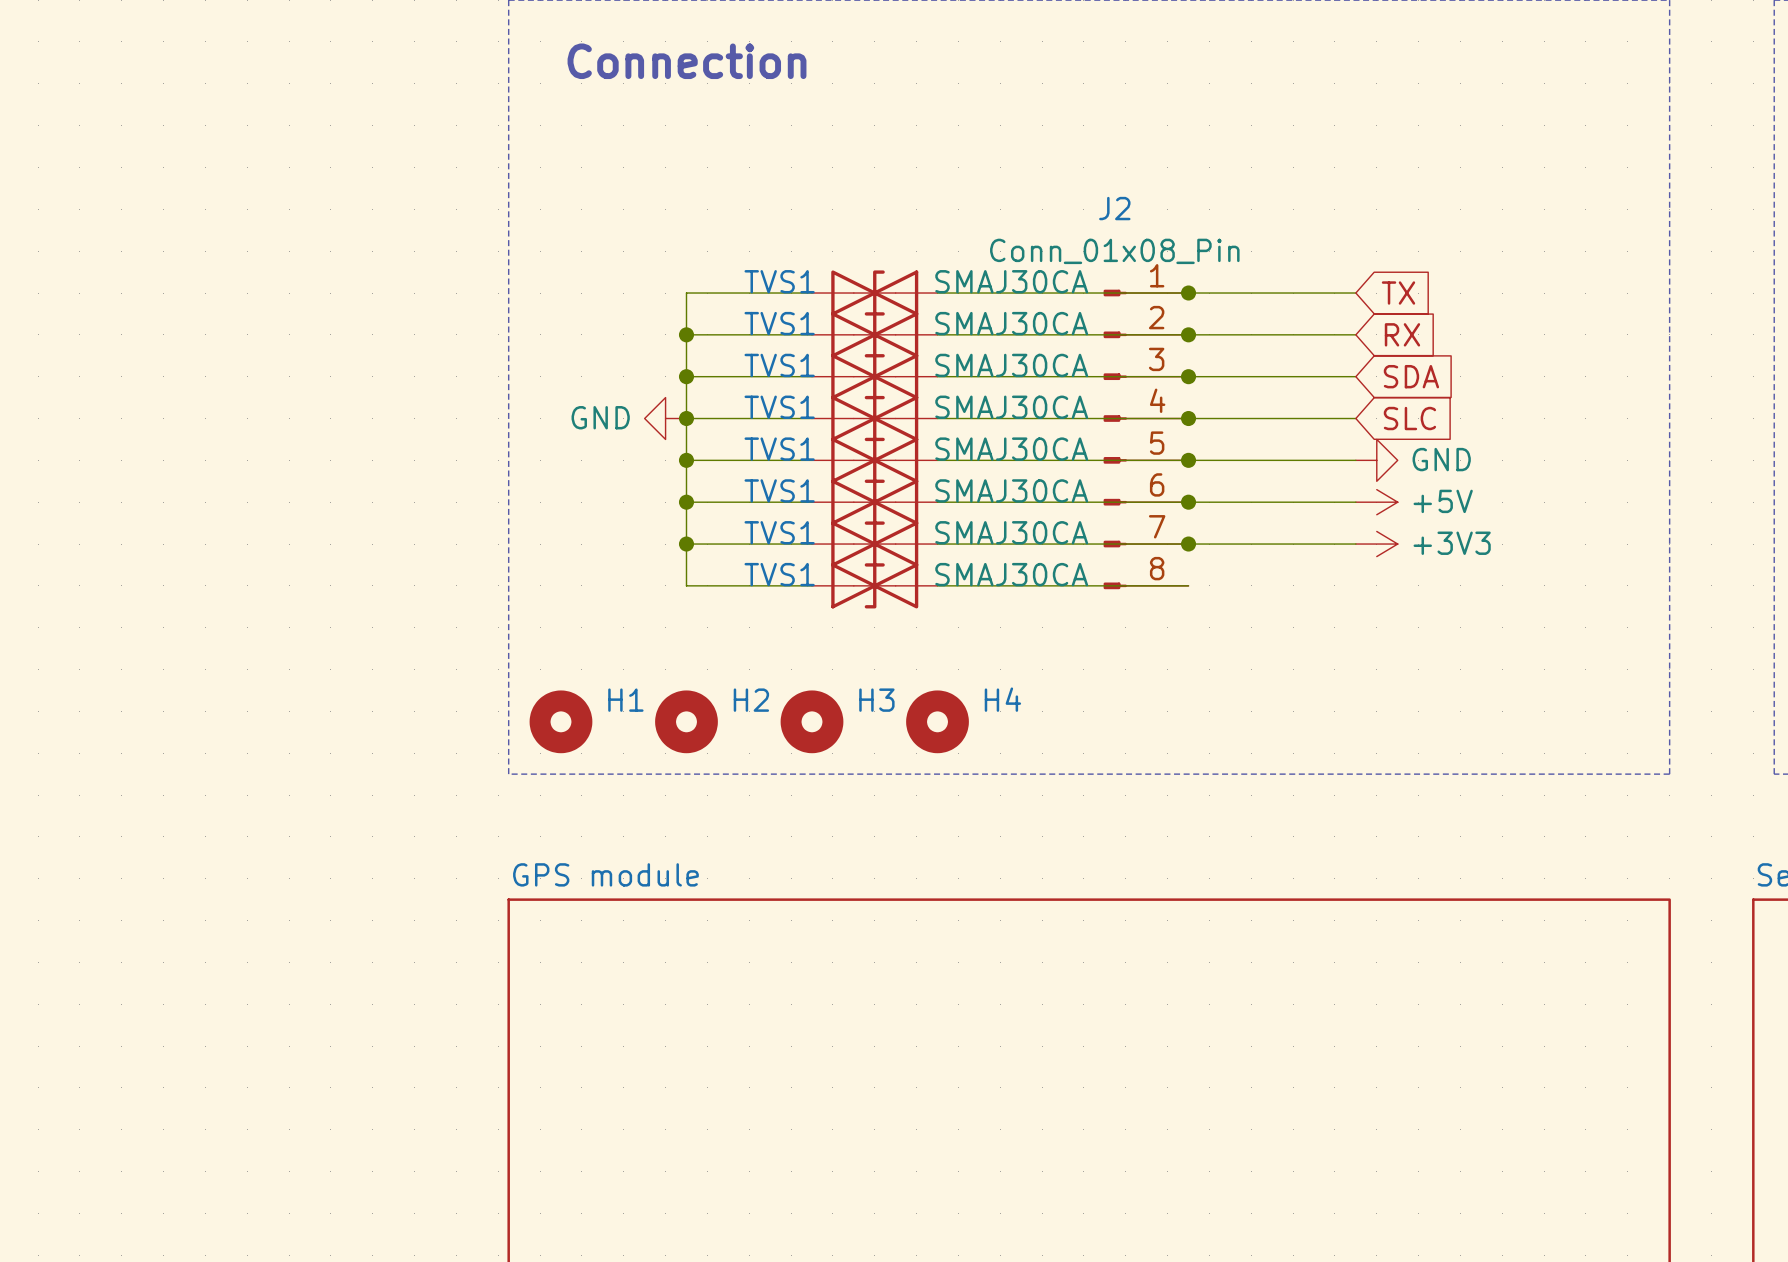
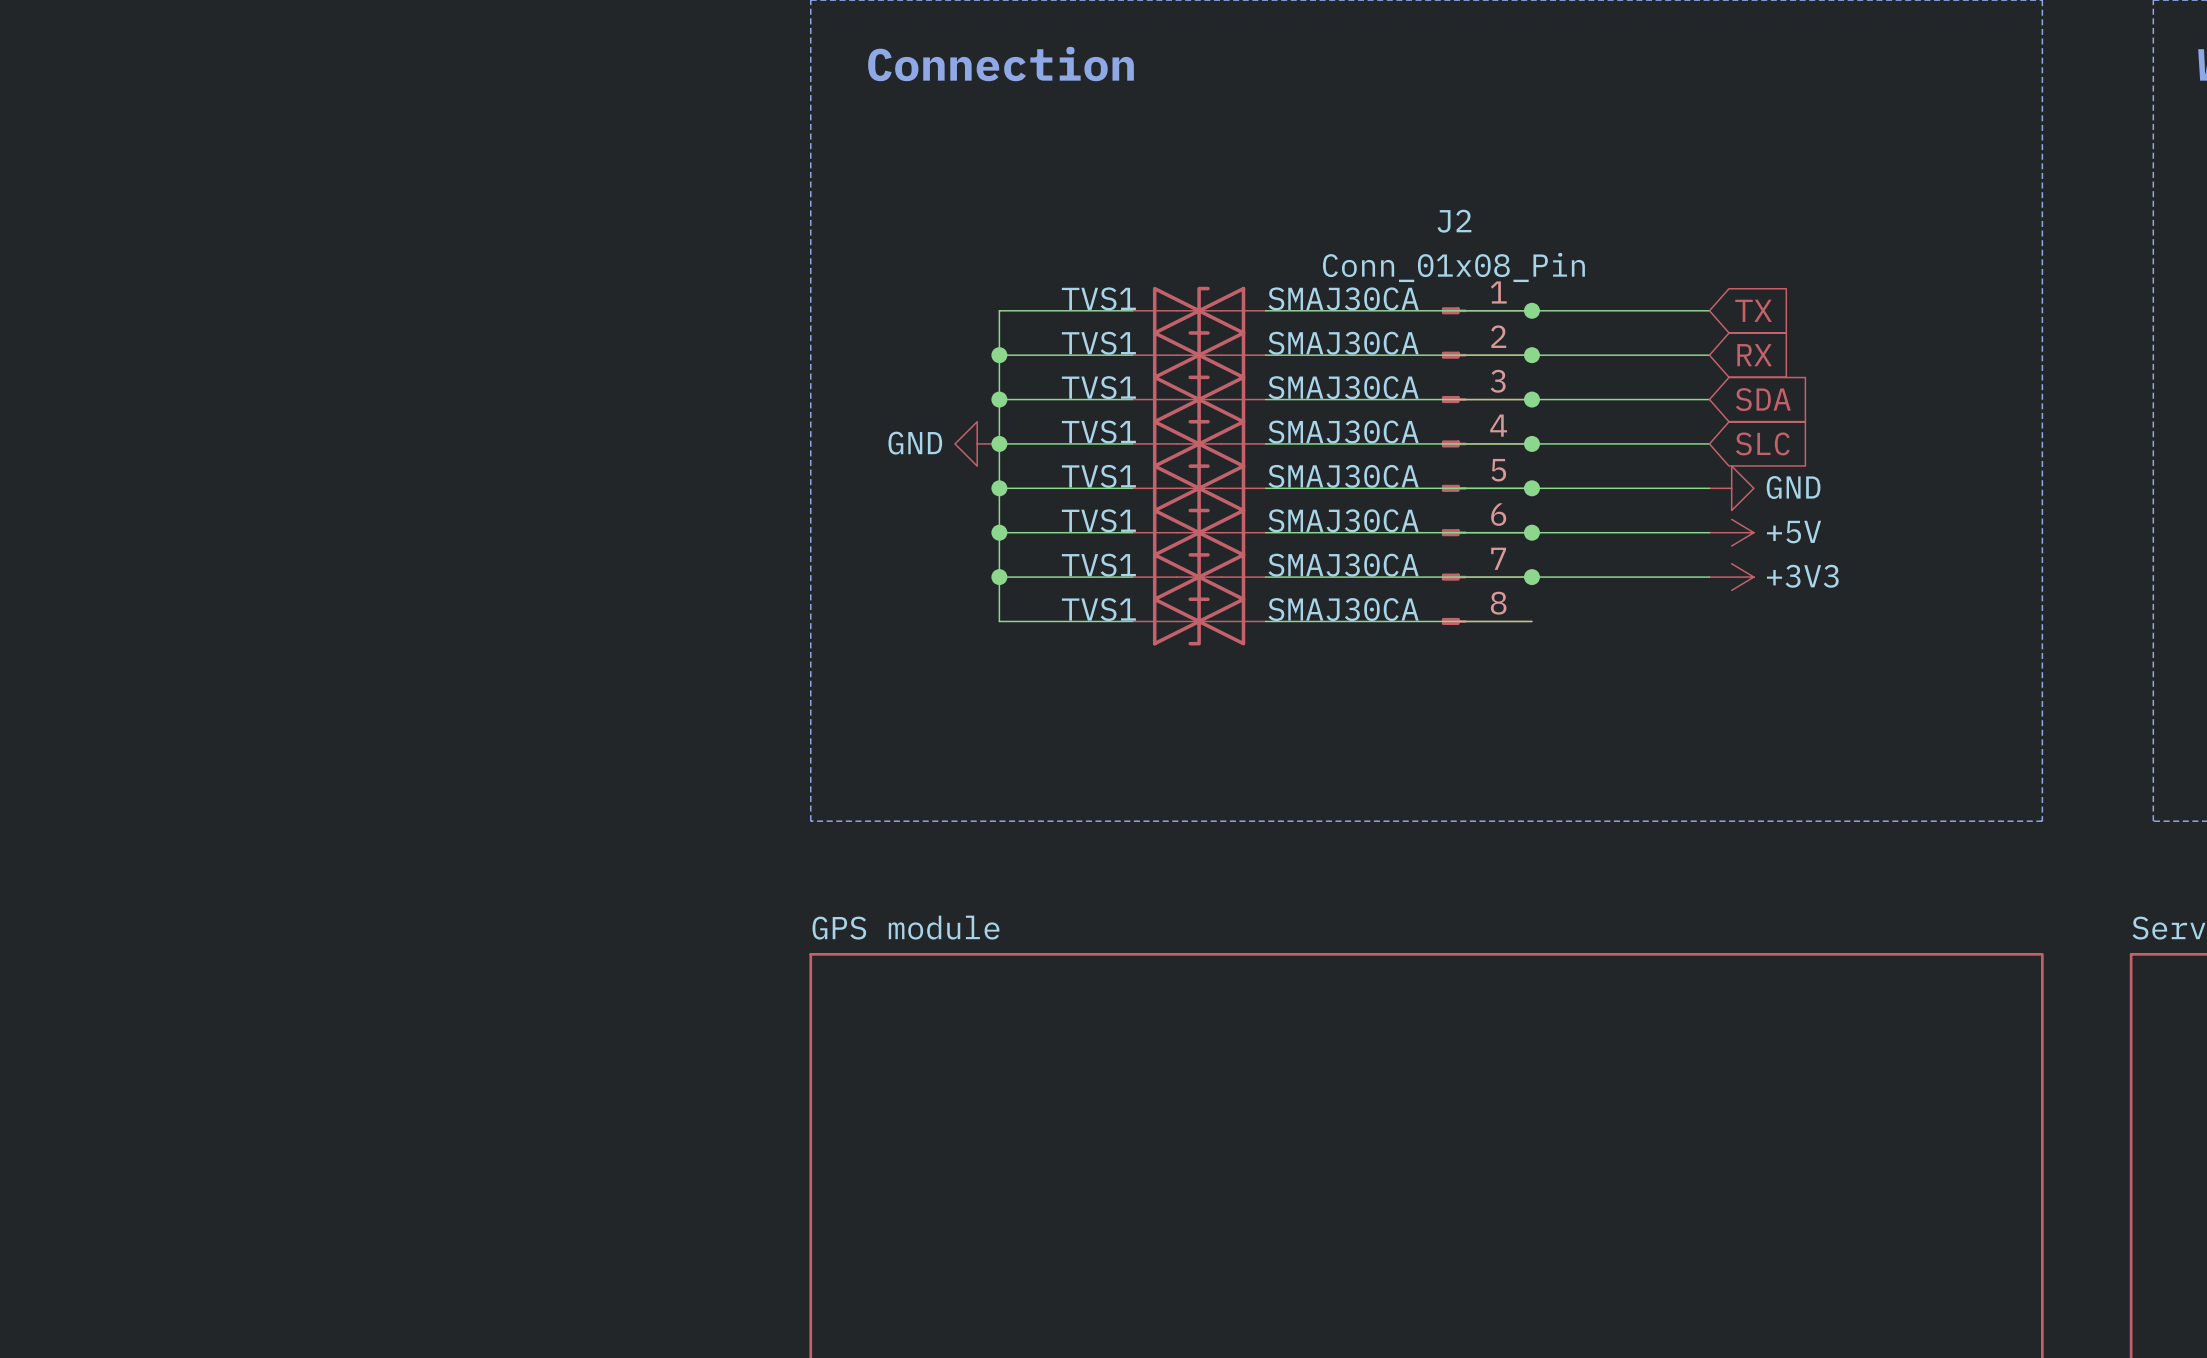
H1: (560, 721) -> none
H2: (686, 721) -> none
H3: (812, 721) -> none
H4: (937, 721) -> none

